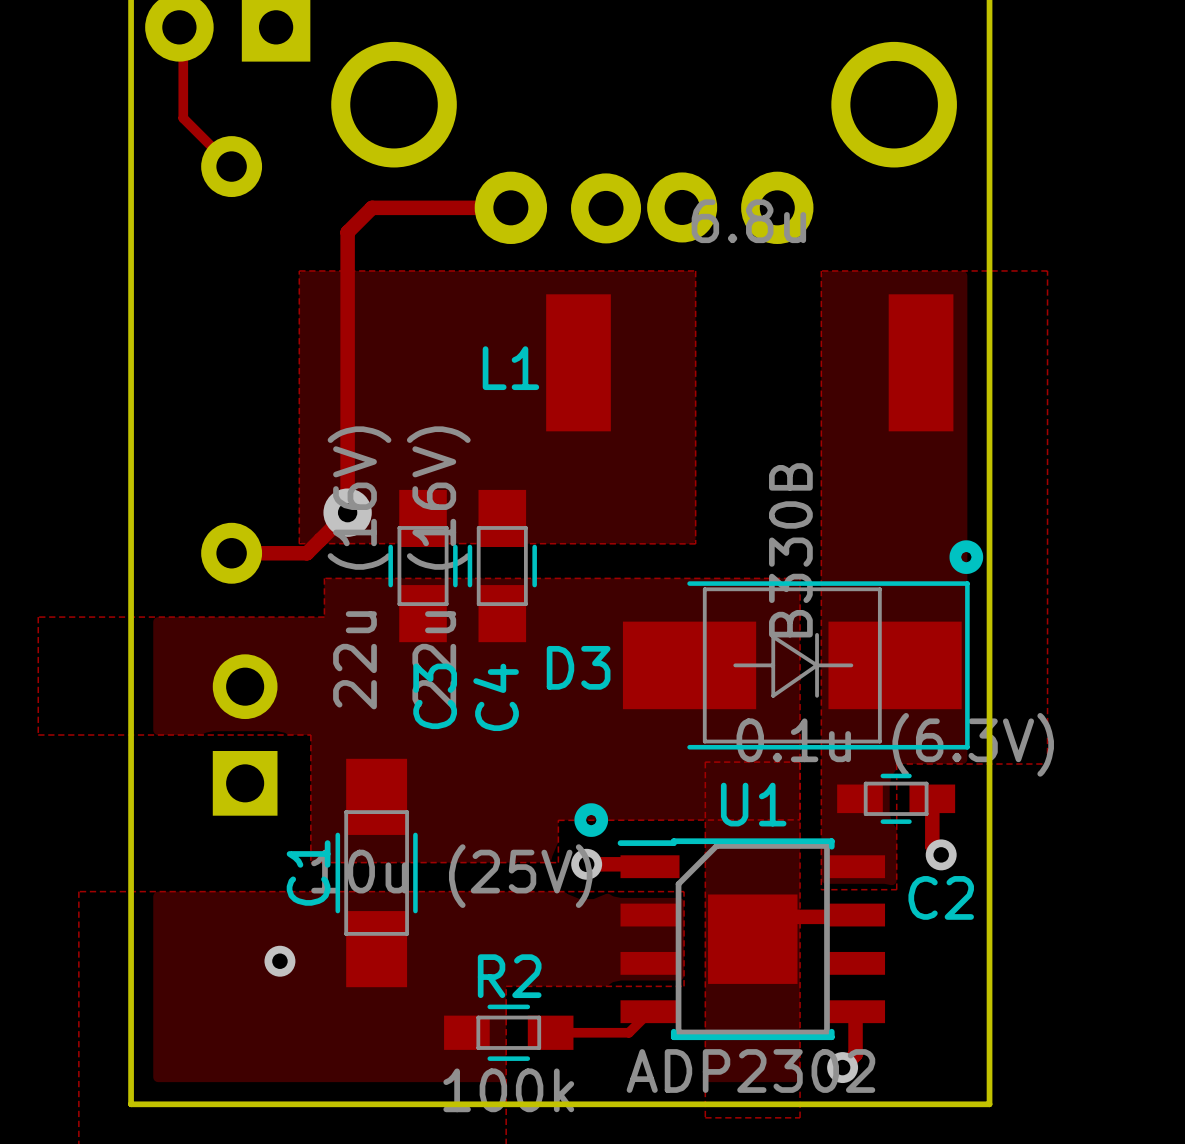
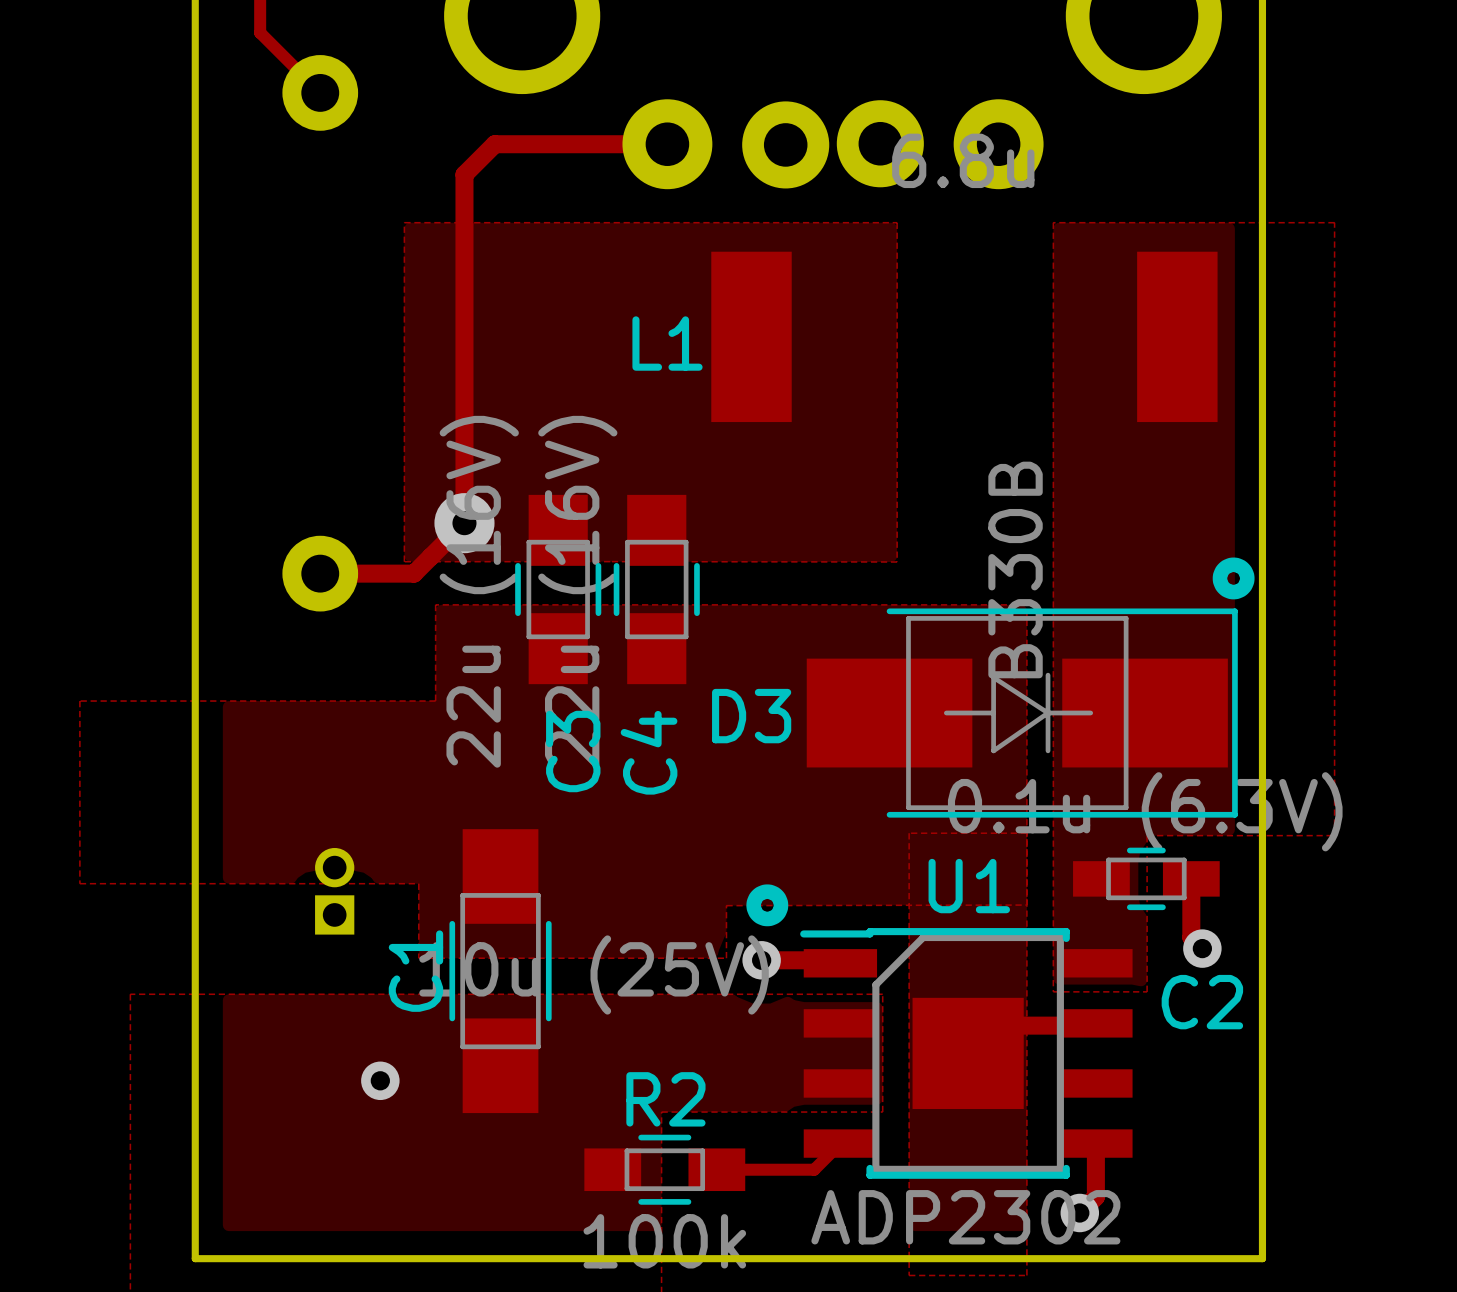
zone outline: (324, 617) (38, 617) (38, 655) -> (435, 652) (435, 701) (79, 701)
zone outline: (38, 735) (310, 735) (310, 802) -> (79, 799) (79, 883) (418, 883)
part: (245, 735) -> none
part: none -> (334, 891)

